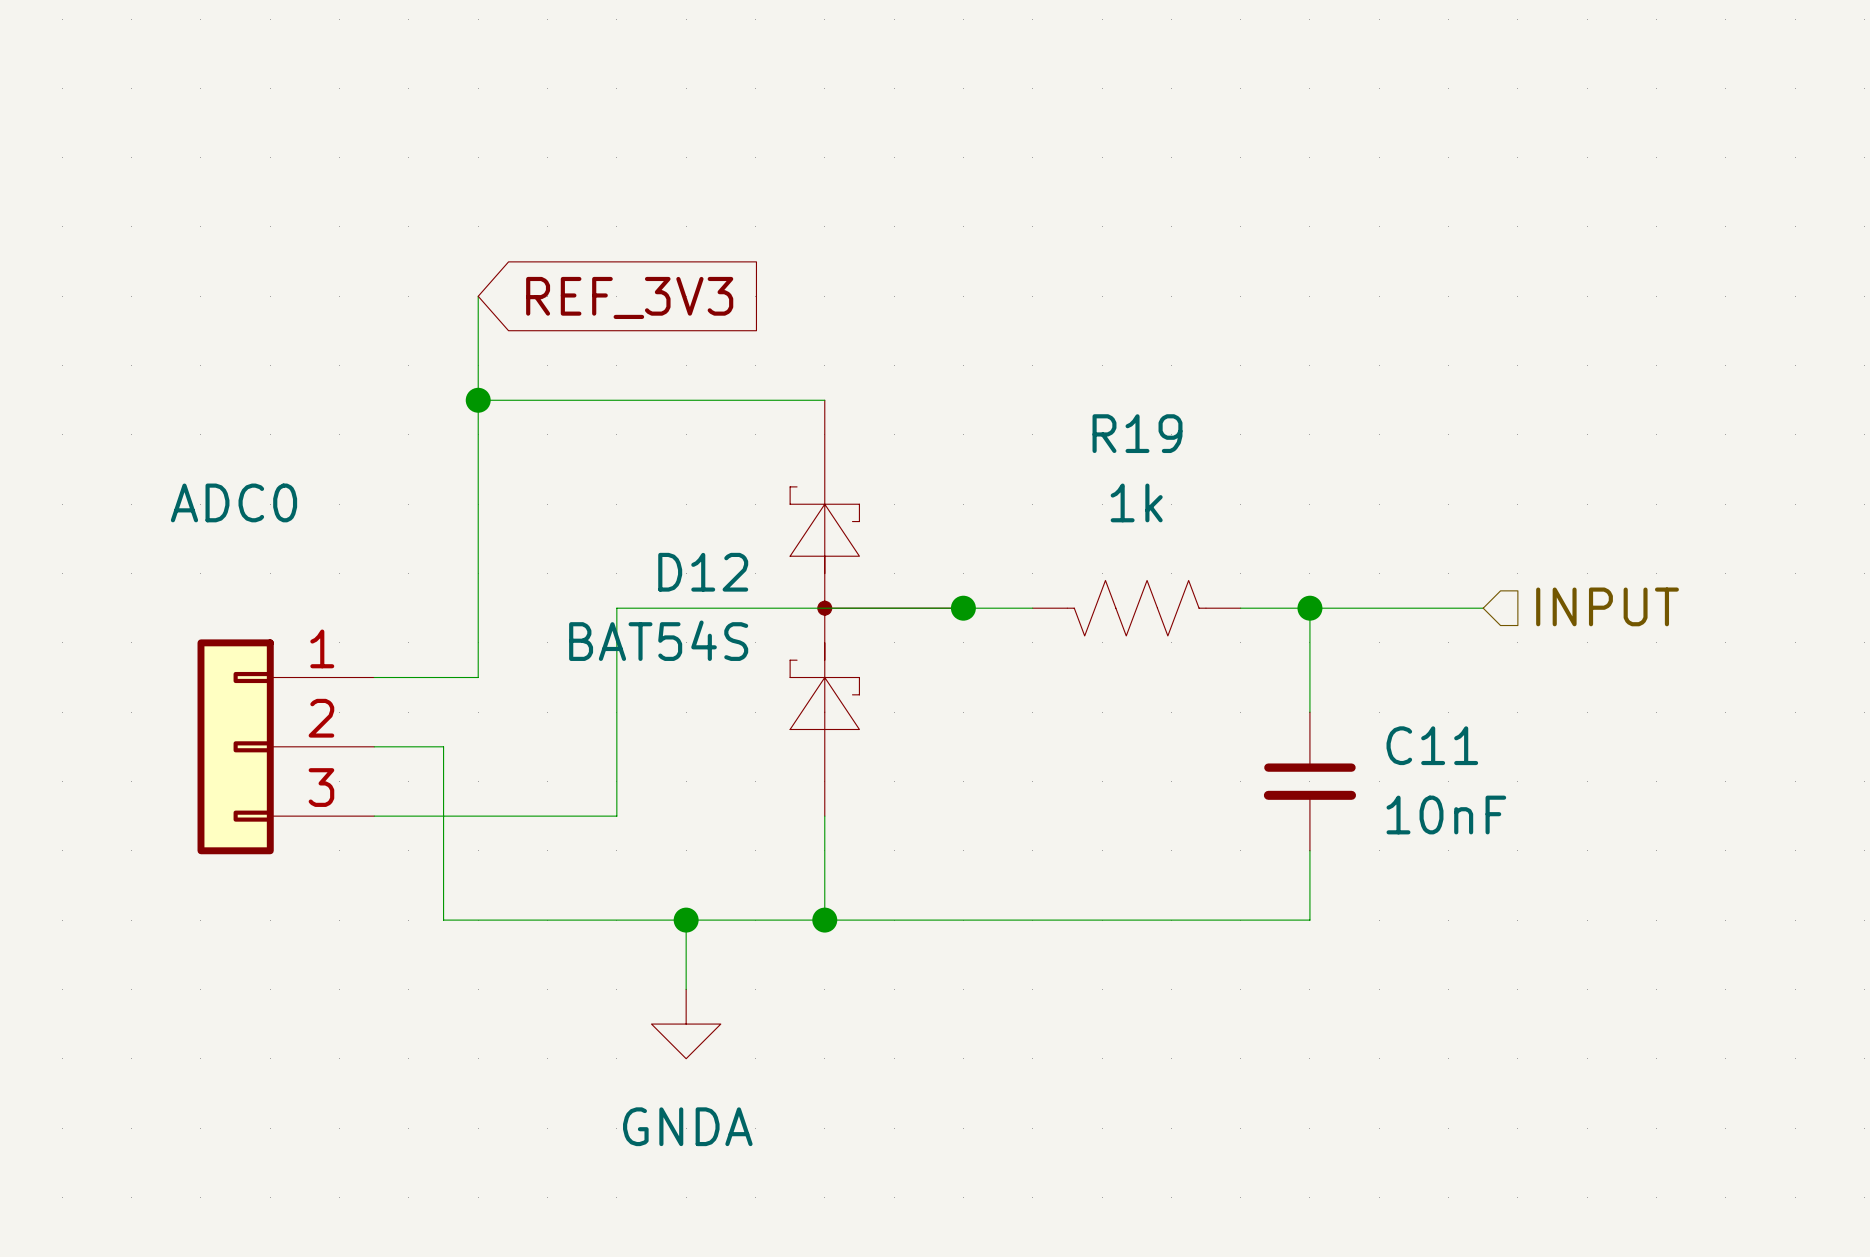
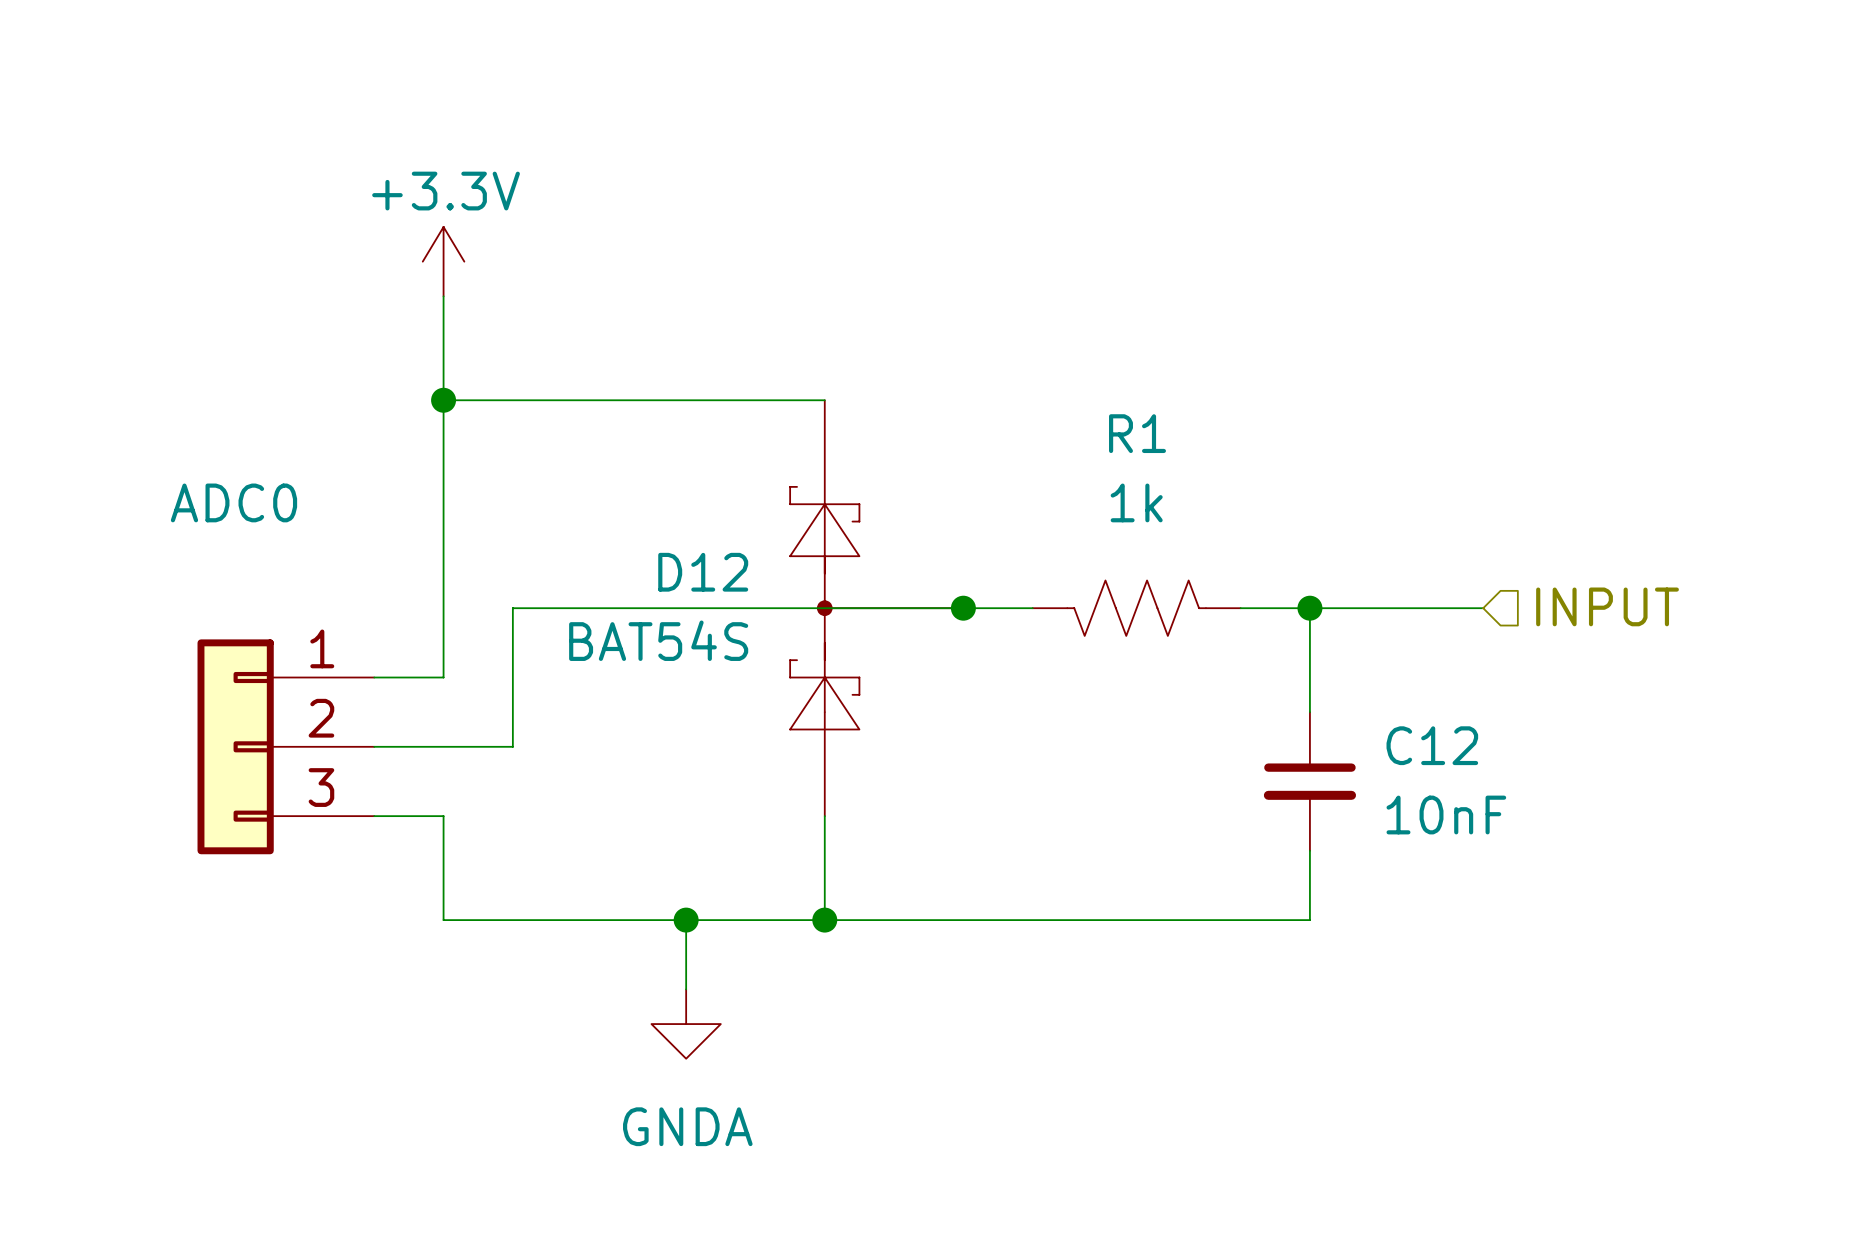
power symbol: none -> +3.3V (443, 261)
wire: (478, 296) (478, 677) (443, 677) -> (443, 296) (443, 677)
global label: REF_3V3 (629, 297) -> none
wire: none -> (443, 400) (478, 400)
junction position: (478, 400) -> (443, 400)
R19 name: R19 (1137, 433) -> R1 (1137, 433)
wire: (616, 608) (616, 816) (443, 816) (443, 746) -> (616, 608) (512, 608) (512, 746) (443, 746)
C11 name: C11 (1432, 745) -> C12 (1432, 745)

